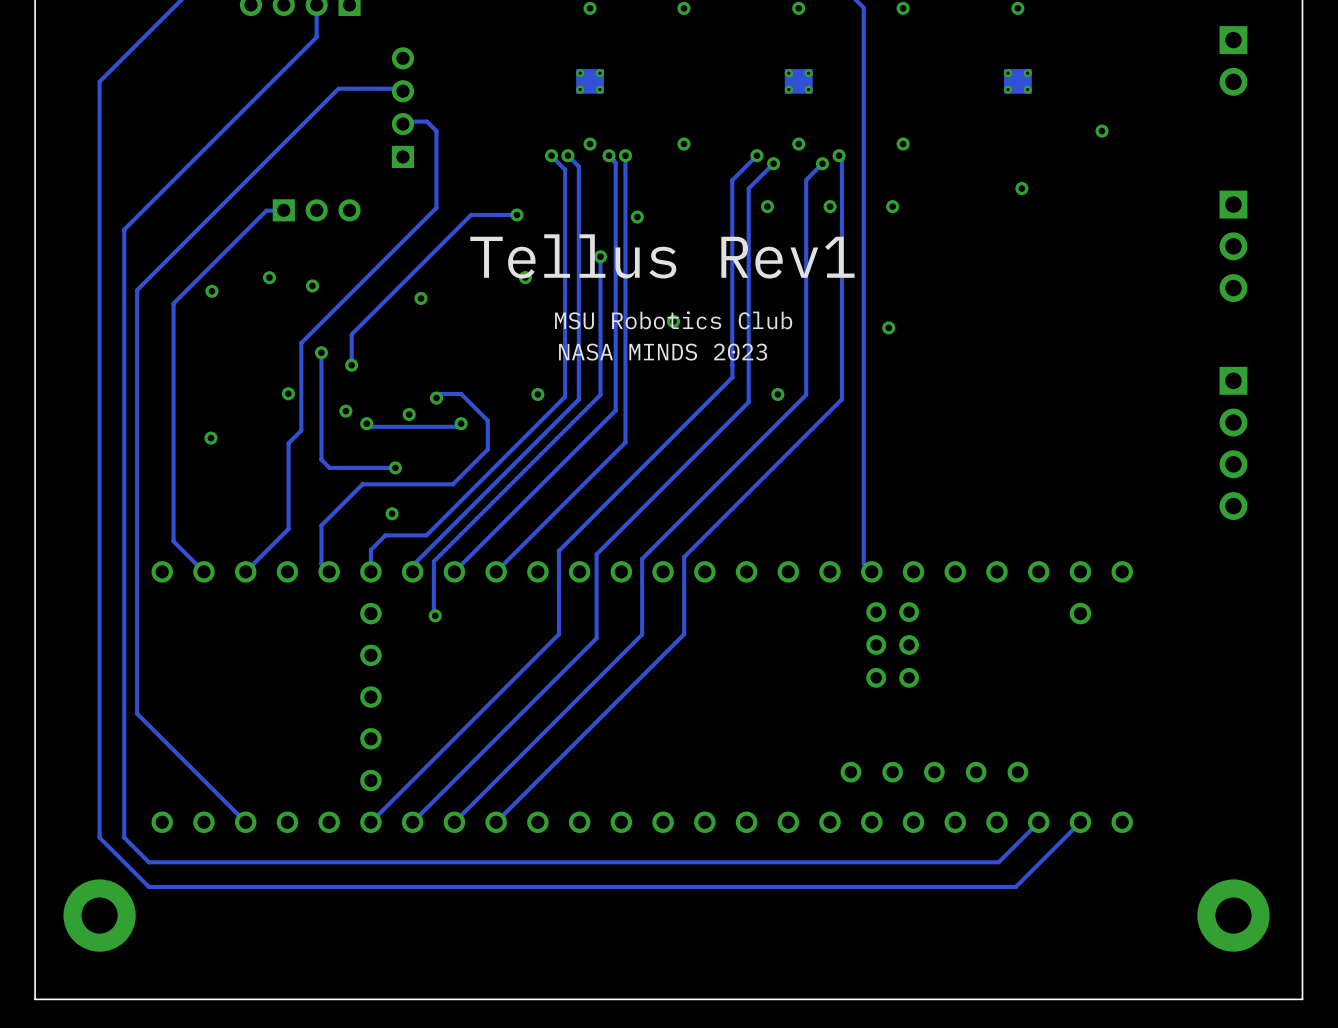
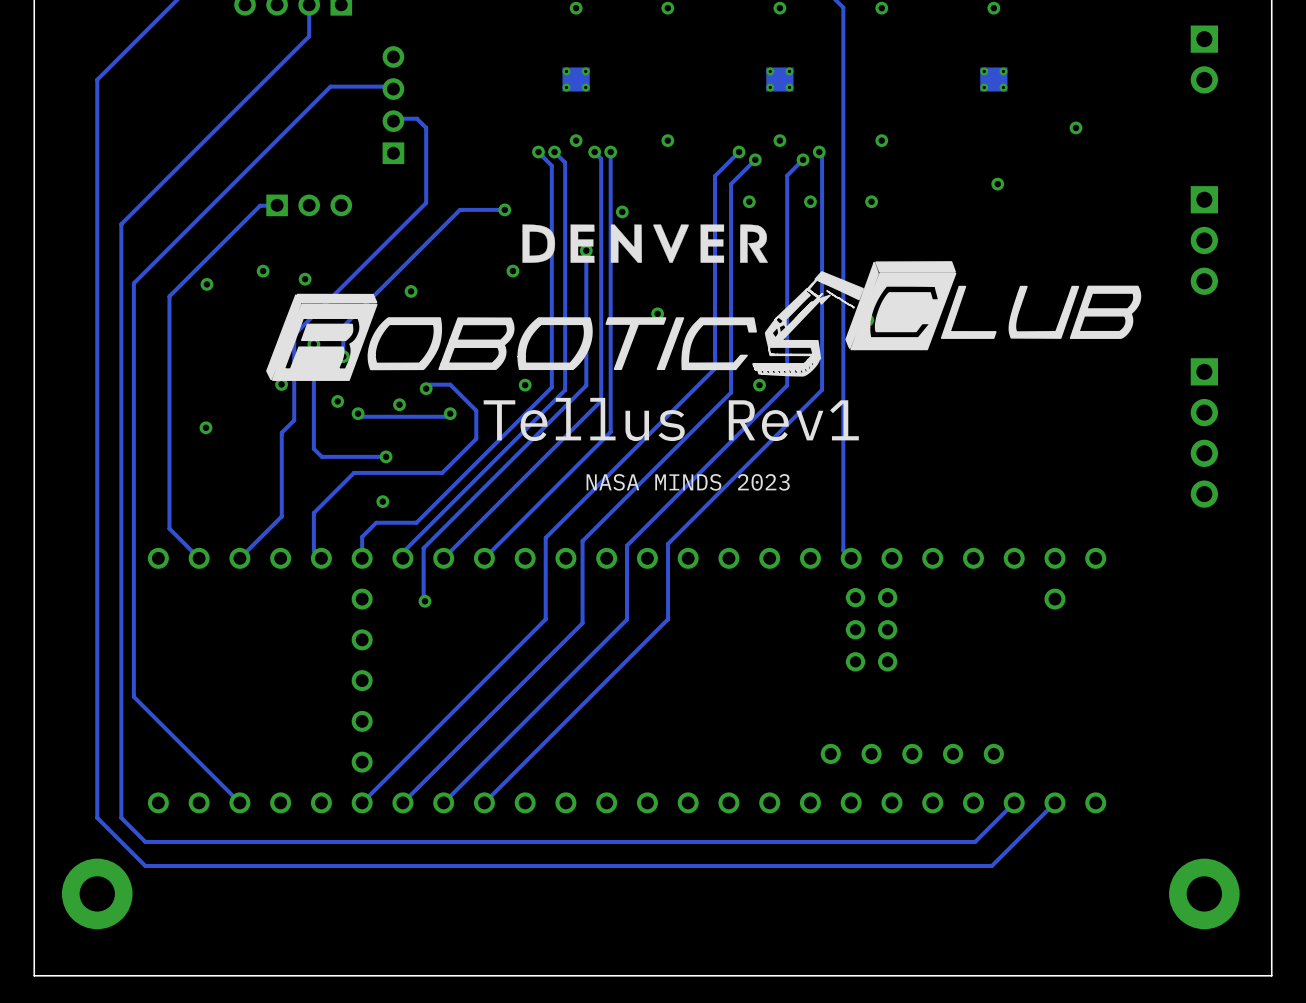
drawing: none -> [522, 224, 768, 263]
text position: Tellus Rev1 (662, 256) -> Tellus Rev1 (671, 419)
drawing: none -> [266, 261, 1142, 381]
line: none -> (819, 276) (807, 289) (818, 296)
text: MSU Robotics Club (673, 320) -> none
text position: NASA MINDS 2023 (663, 352) -> NASA MINDS 2023 (688, 482)
line: none -> (770, 354) (812, 354)

